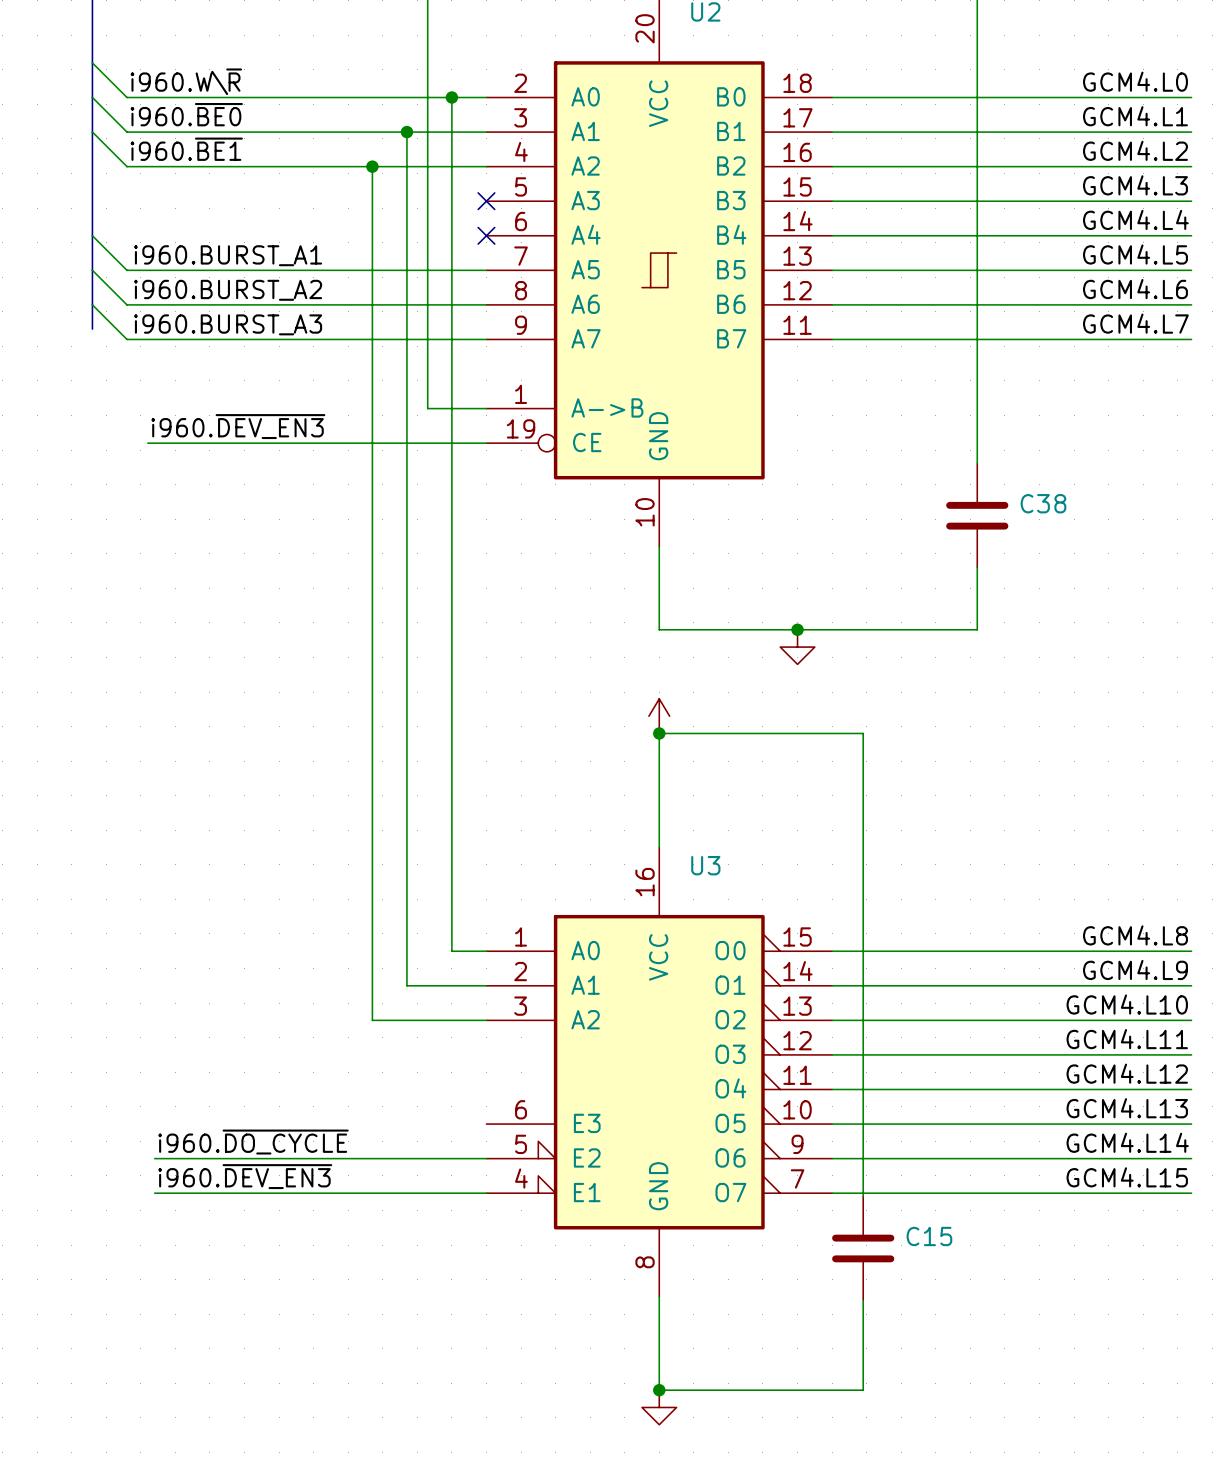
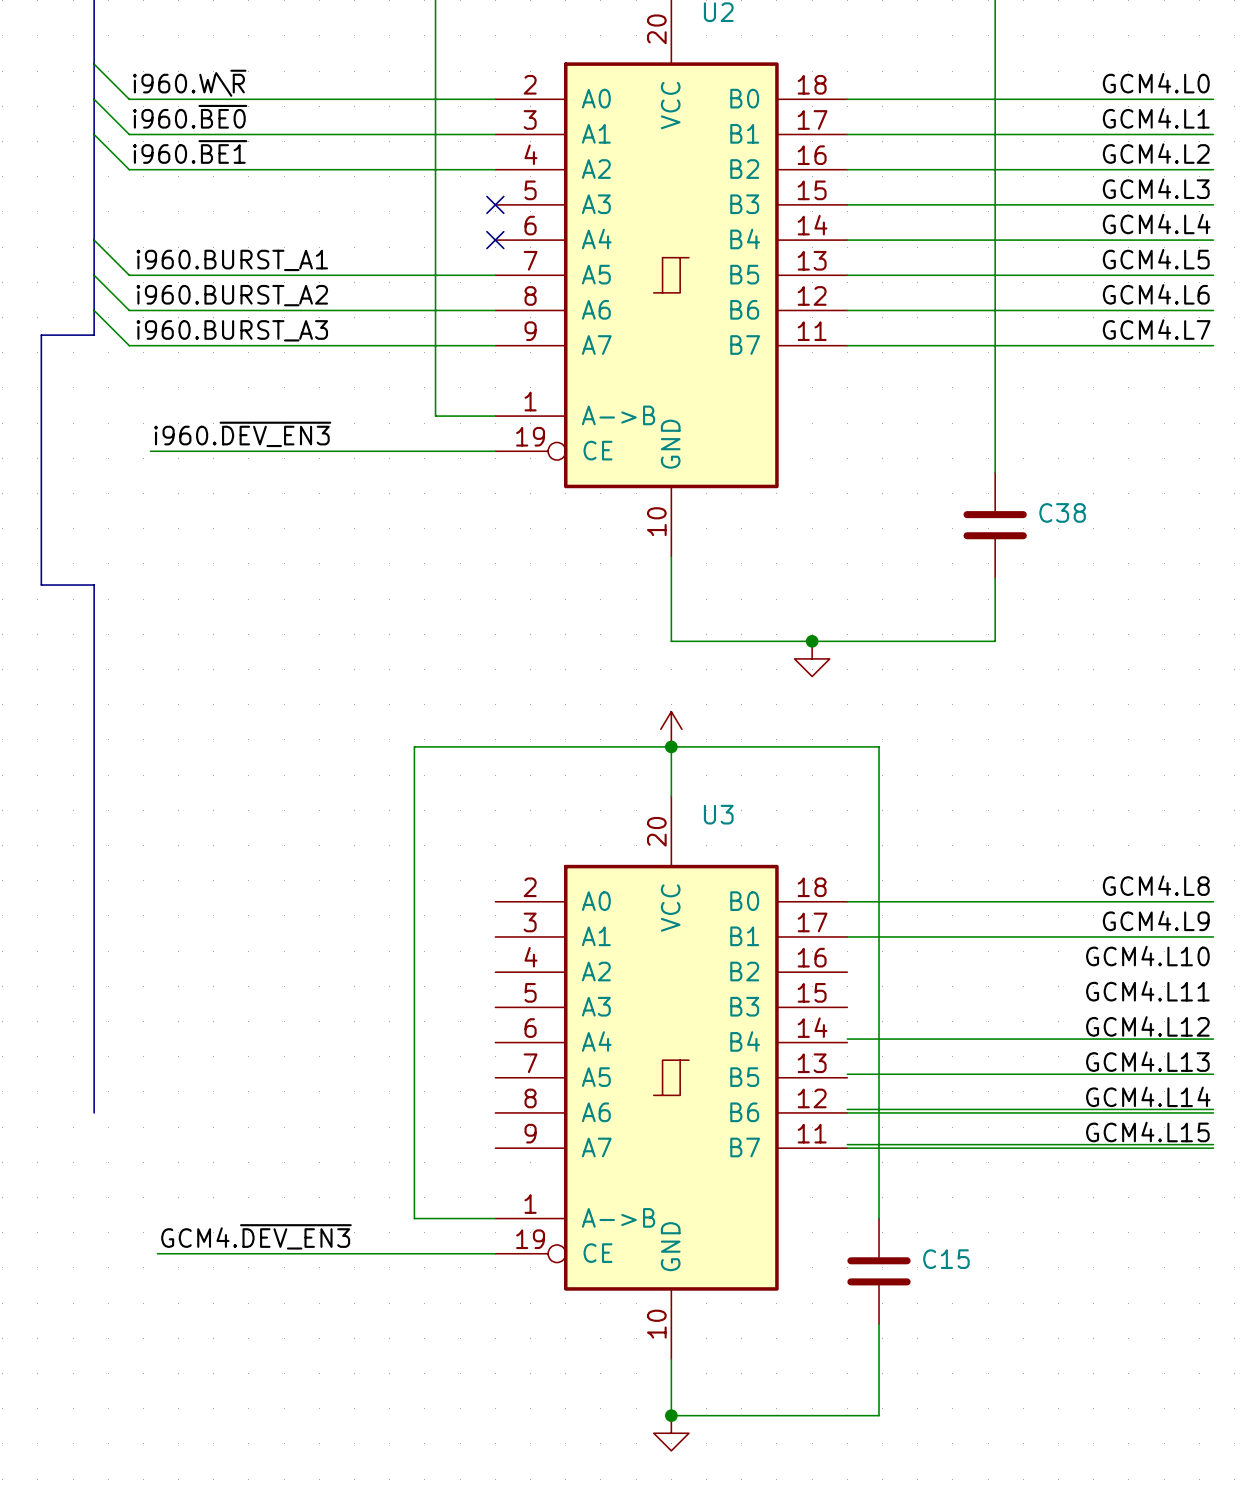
wire: (451, 97) (451, 951) (486, 951) -> none
junction: (451, 97) -> none
wire: (406, 132) (406, 733) -> (671, 746) (414, 746)
junction: (406, 132) -> none
wire: (372, 166) (372, 1020) (486, 1020) -> none
junction: (372, 166) -> none
bus: none -> (94, 335) (41, 335) (41, 585) (94, 585) (94, 1112)
U3 symbol: [486, 847, 833, 1297] -> [495, 796, 848, 1360]
U3 name position: U3 (705, 865) -> U3 (718, 814)
label position: GCM4.L8 (1135, 935) -> GCM4.L8 (1156, 885)
wire: (832, 951) (1191, 951) -> (847, 901) (1213, 901)
label position: GCM4.L9 (1135, 969) -> GCM4.L9 (1156, 920)
wire: (406, 985) (486, 985) -> (414, 1003) (414, 1218) (495, 1218)
wire: (832, 985) (1191, 985) -> (847, 936) (1213, 936)
label position: GCM4.L10 (1127, 1004) -> GCM4.L10 (1147, 956)
label position: GCM4.L11 (1127, 1039) -> GCM4.L11 (1147, 991)
label position: GCM4.L12 (1127, 1073) -> GCM4.L12 (1147, 1026)
label position: GCM4.L13 (1127, 1108) -> GCM4.L13 (1147, 1061)
label: i960.~{DO_CYCLE} (253, 1142) -> none
label position: GCM4.L14 (1127, 1142) -> GCM4.L14 (1148, 1096)
wire: (154, 1158) (486, 1158) -> none
wire: (832, 1158) (1191, 1158) -> (847, 1112) (1213, 1112)
label: i960.~{DEV_EN3} (245, 1176) -> none
label position: GCM4.L15 (1127, 1177) -> GCM4.L15 (1147, 1132)
wire: (154, 1193) (486, 1193) -> (157, 1253) (495, 1253)
wire: (832, 1193) (1191, 1193) -> (847, 1148) (1213, 1148)
label: none -> GCM4.~{DEV_EN3} (256, 1236)

